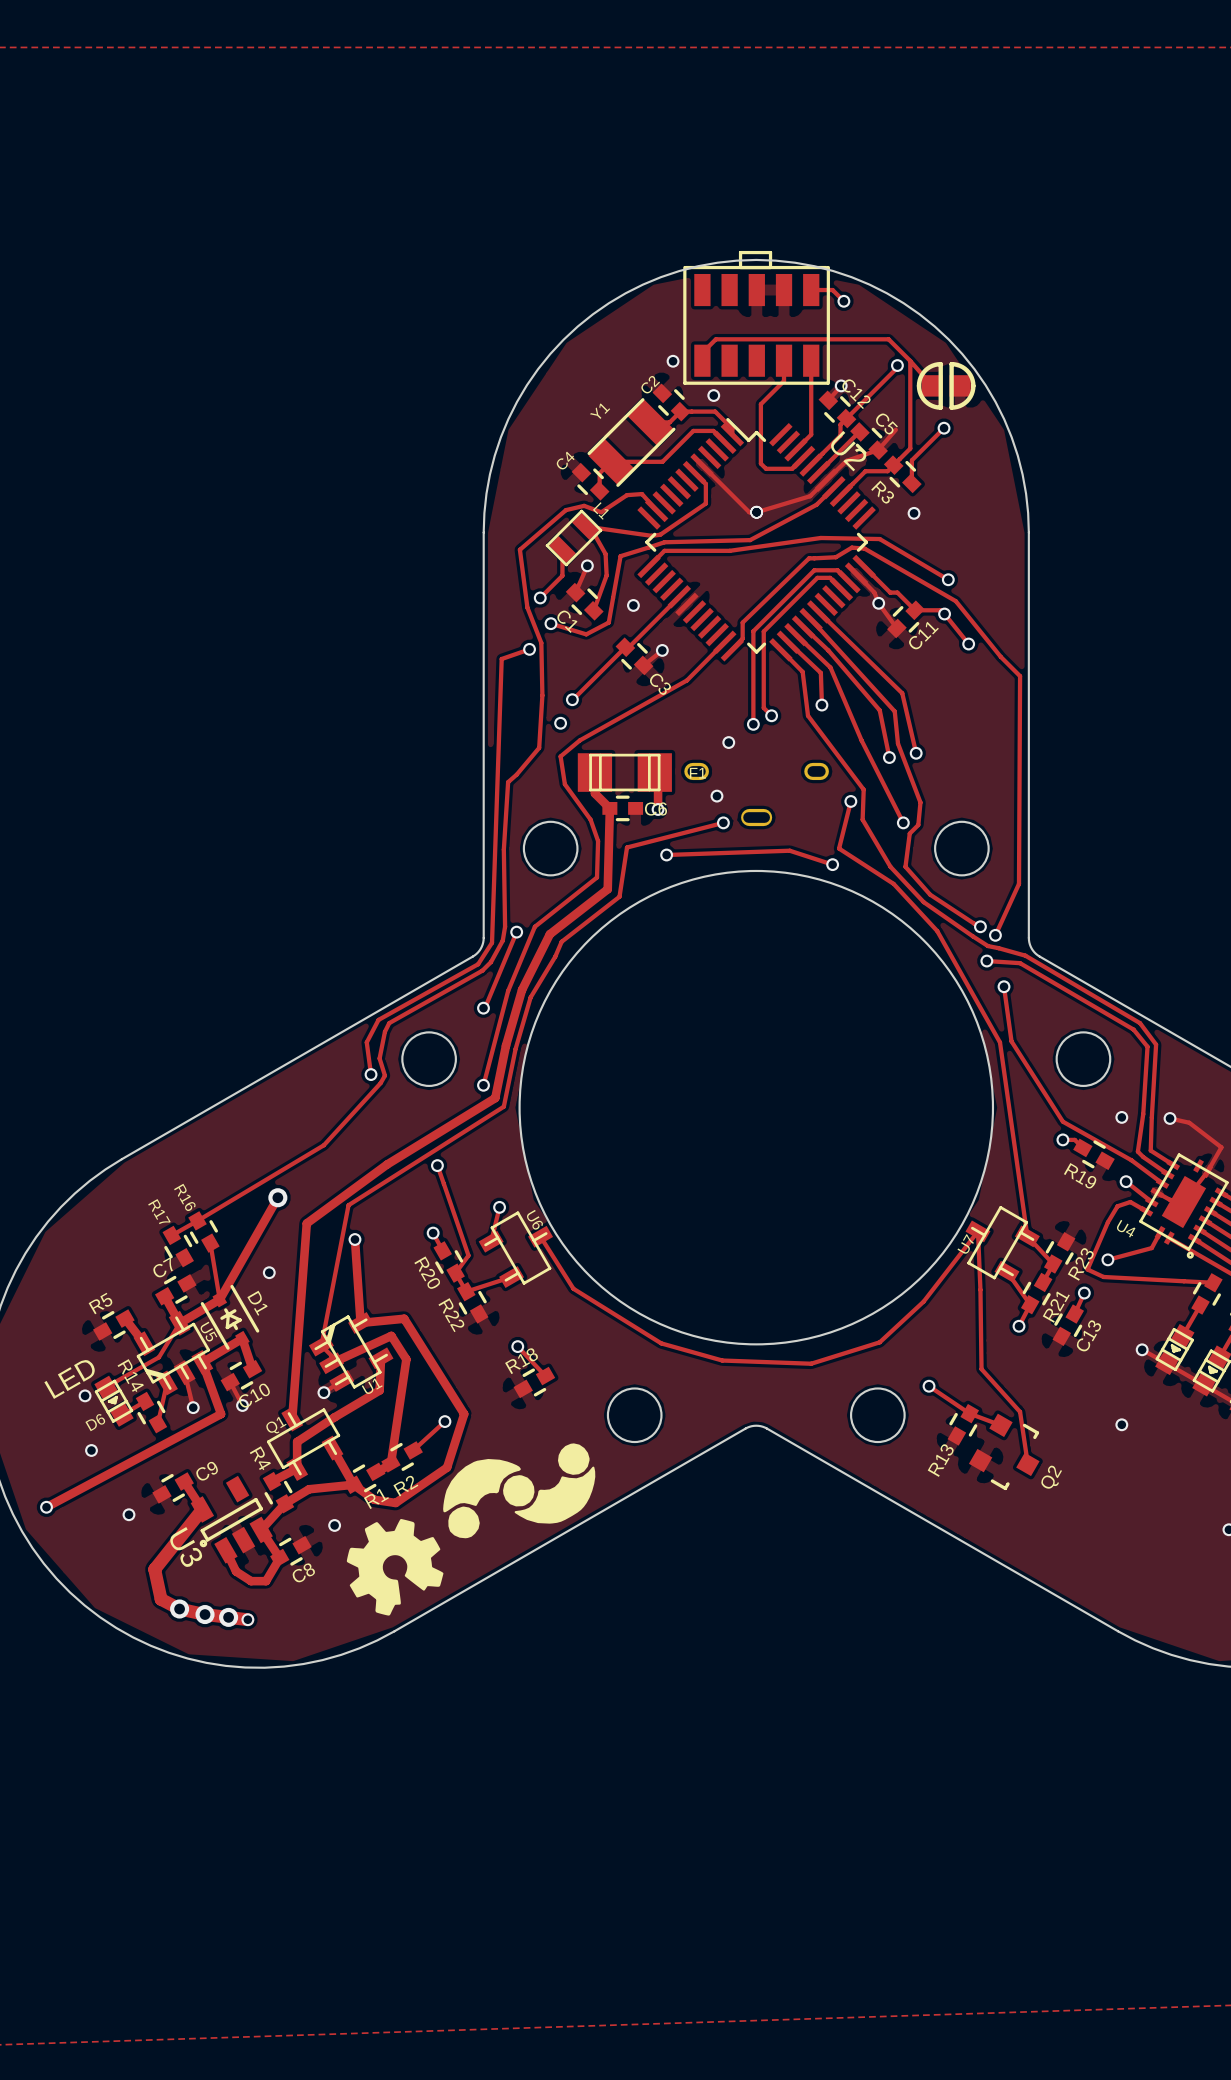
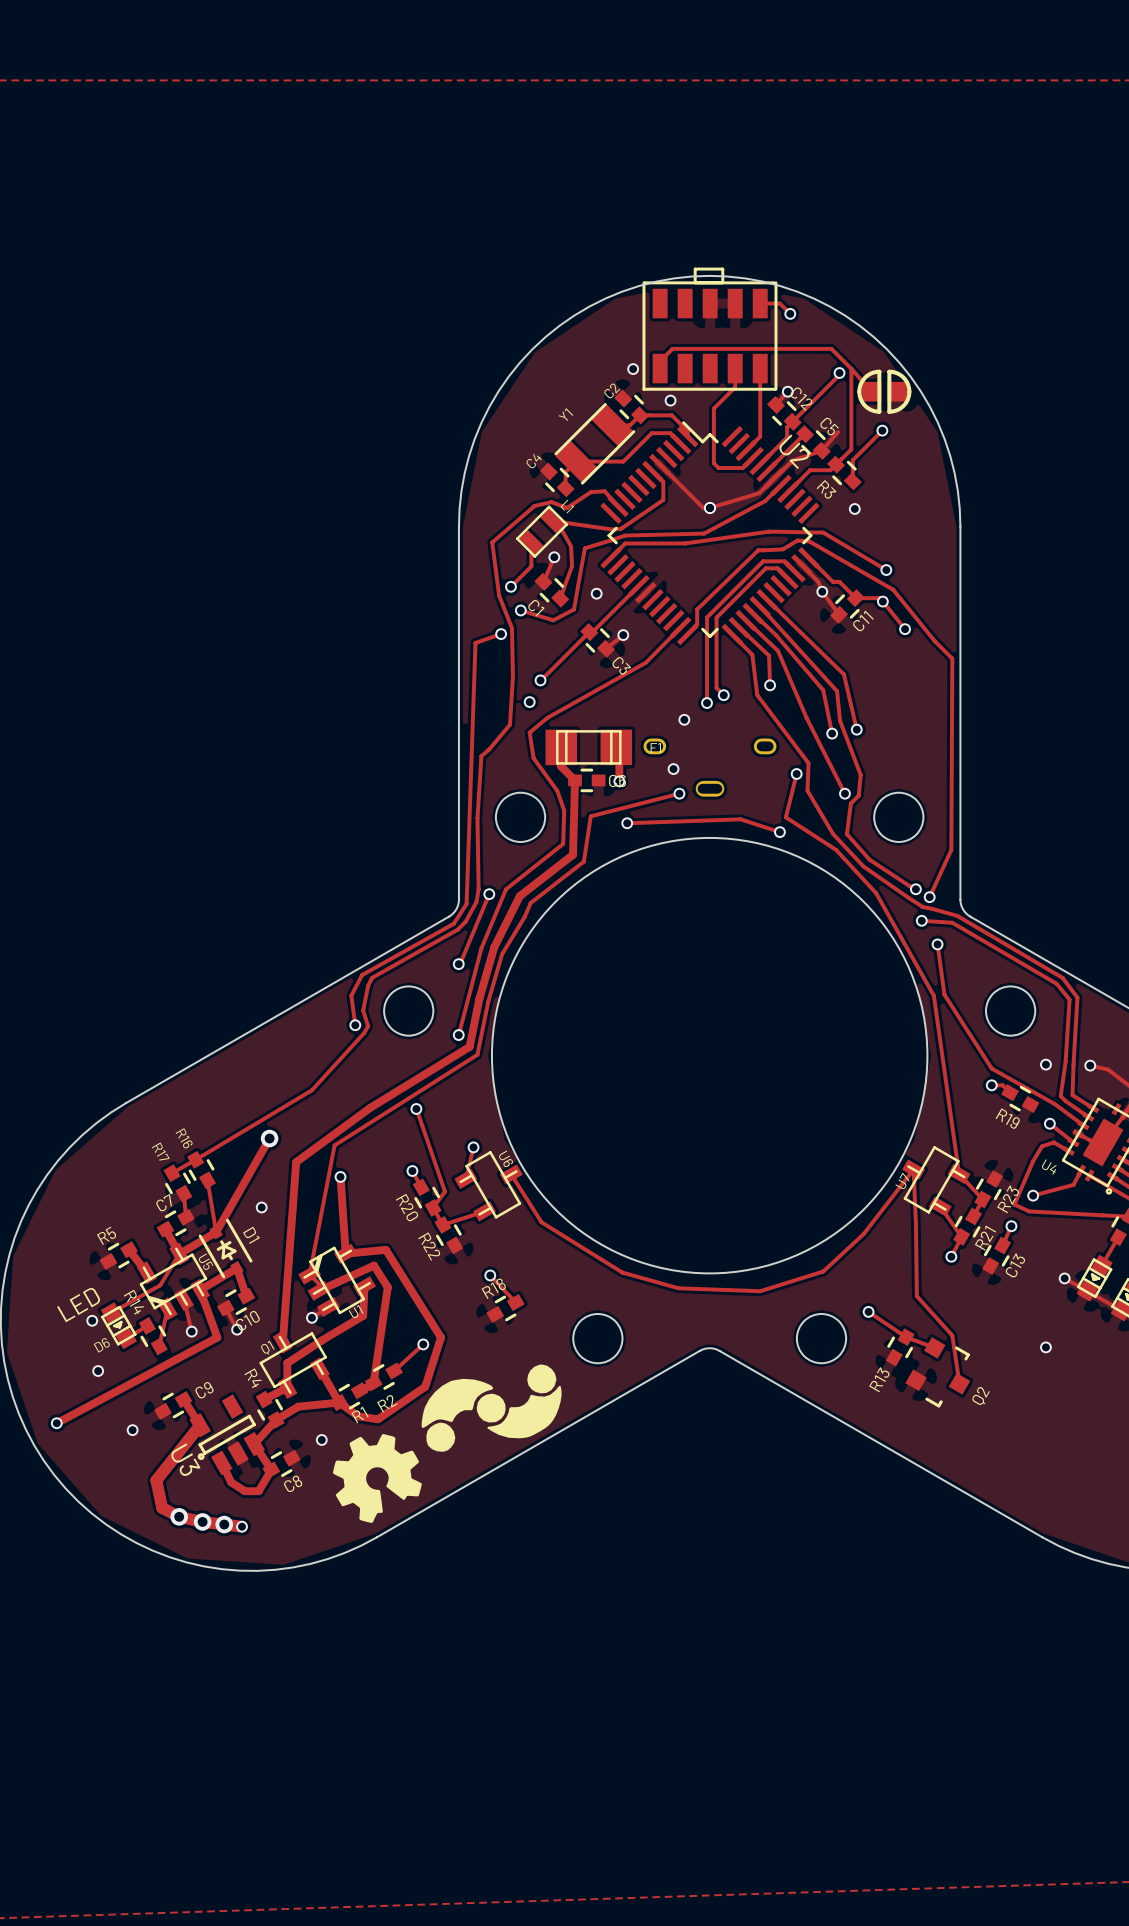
track: none -> (183, 1193) (185, 1217)

